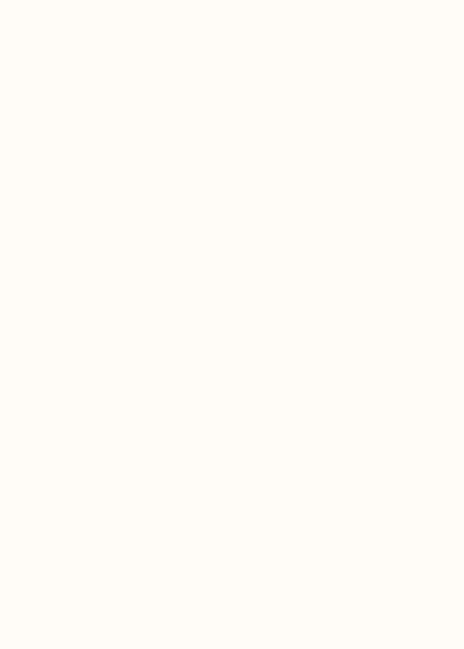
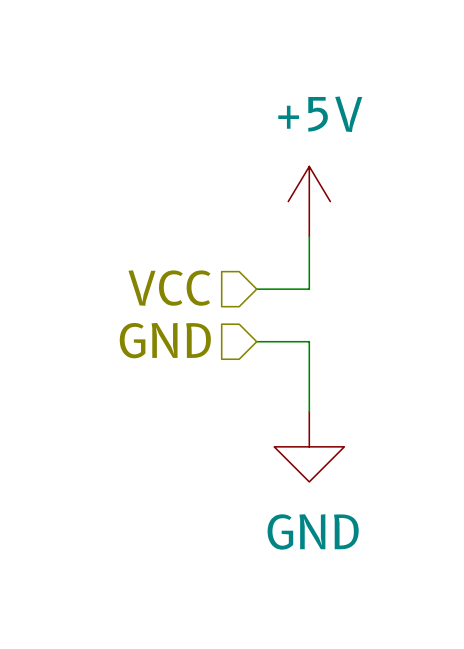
power symbol: none -> +5V (309, 201)
wire: none -> (309, 236) (309, 289) (256, 289)
hierarchical label: none -> VCC (169, 288)
hierarchical label: none -> GND (165, 340)
wire: none -> (256, 341) (309, 341) (309, 411)
power symbol: none -> GND (309, 446)

